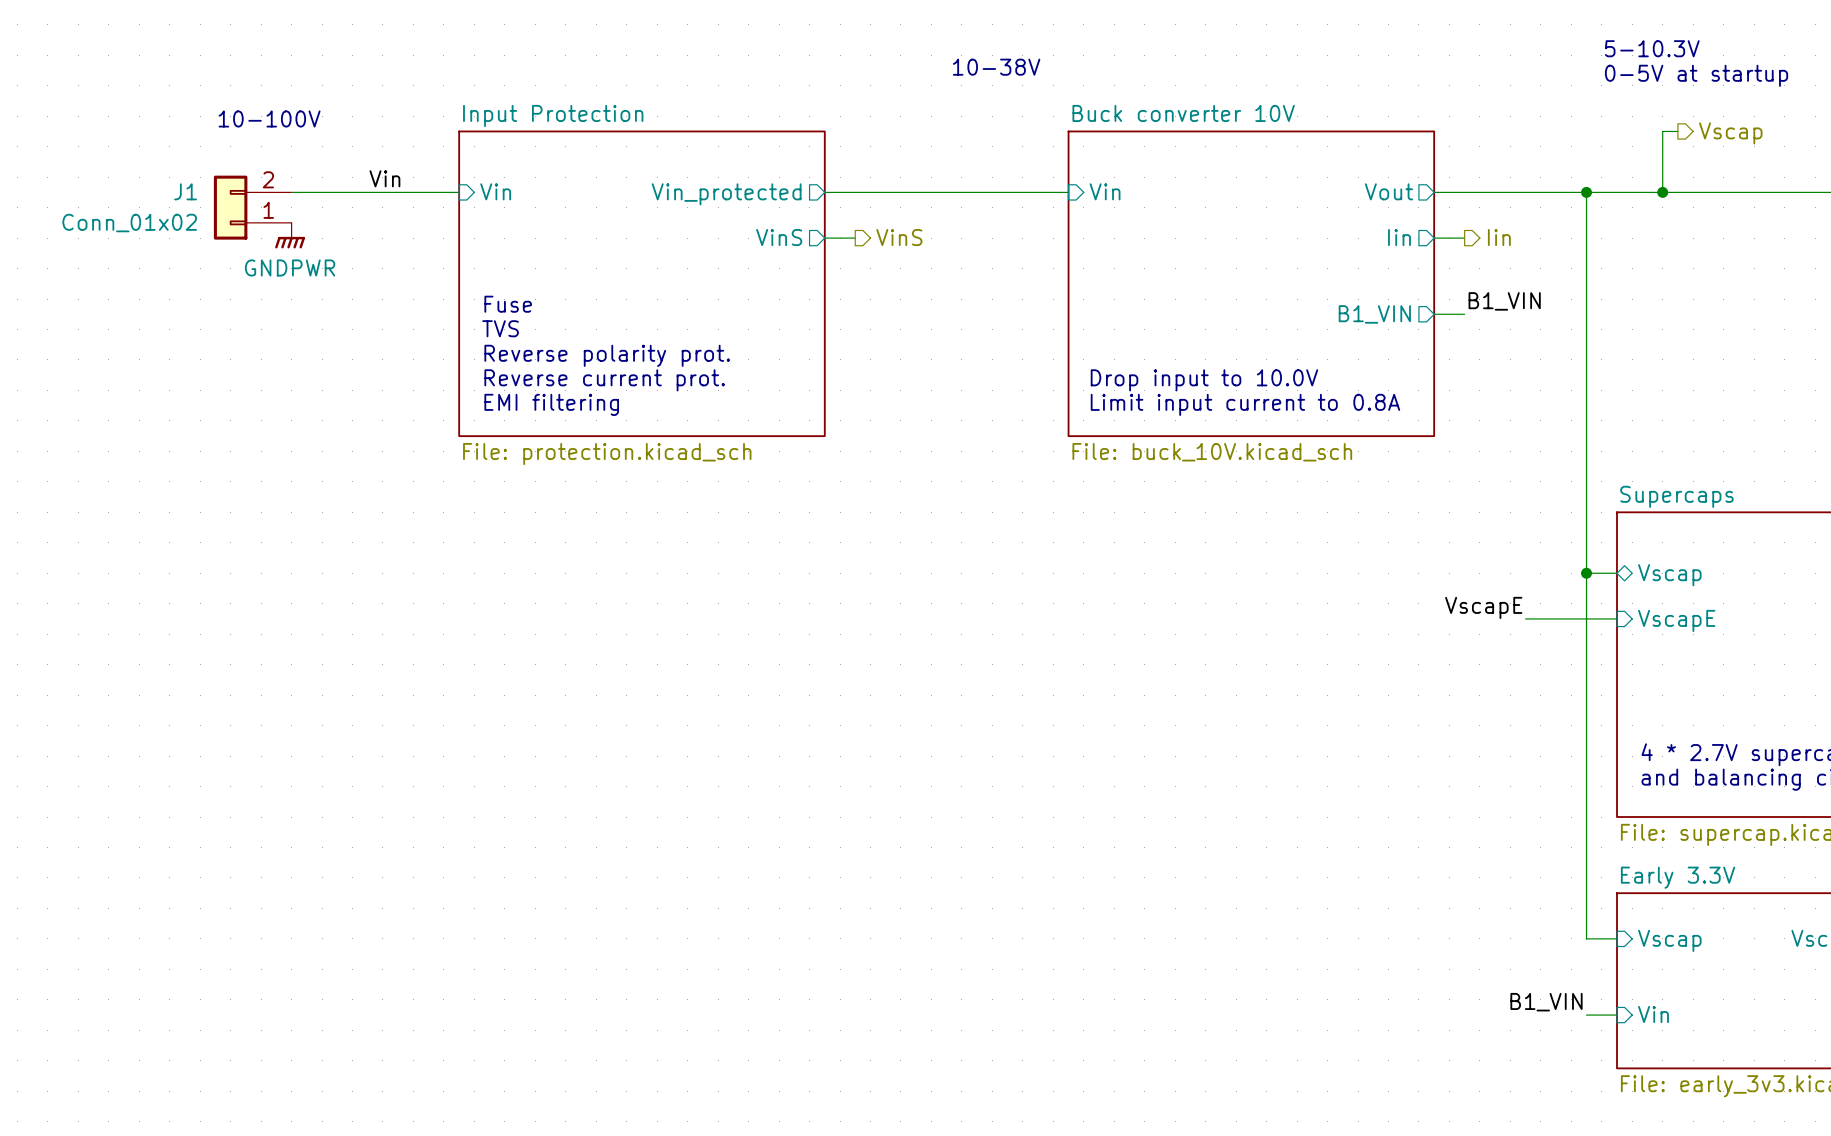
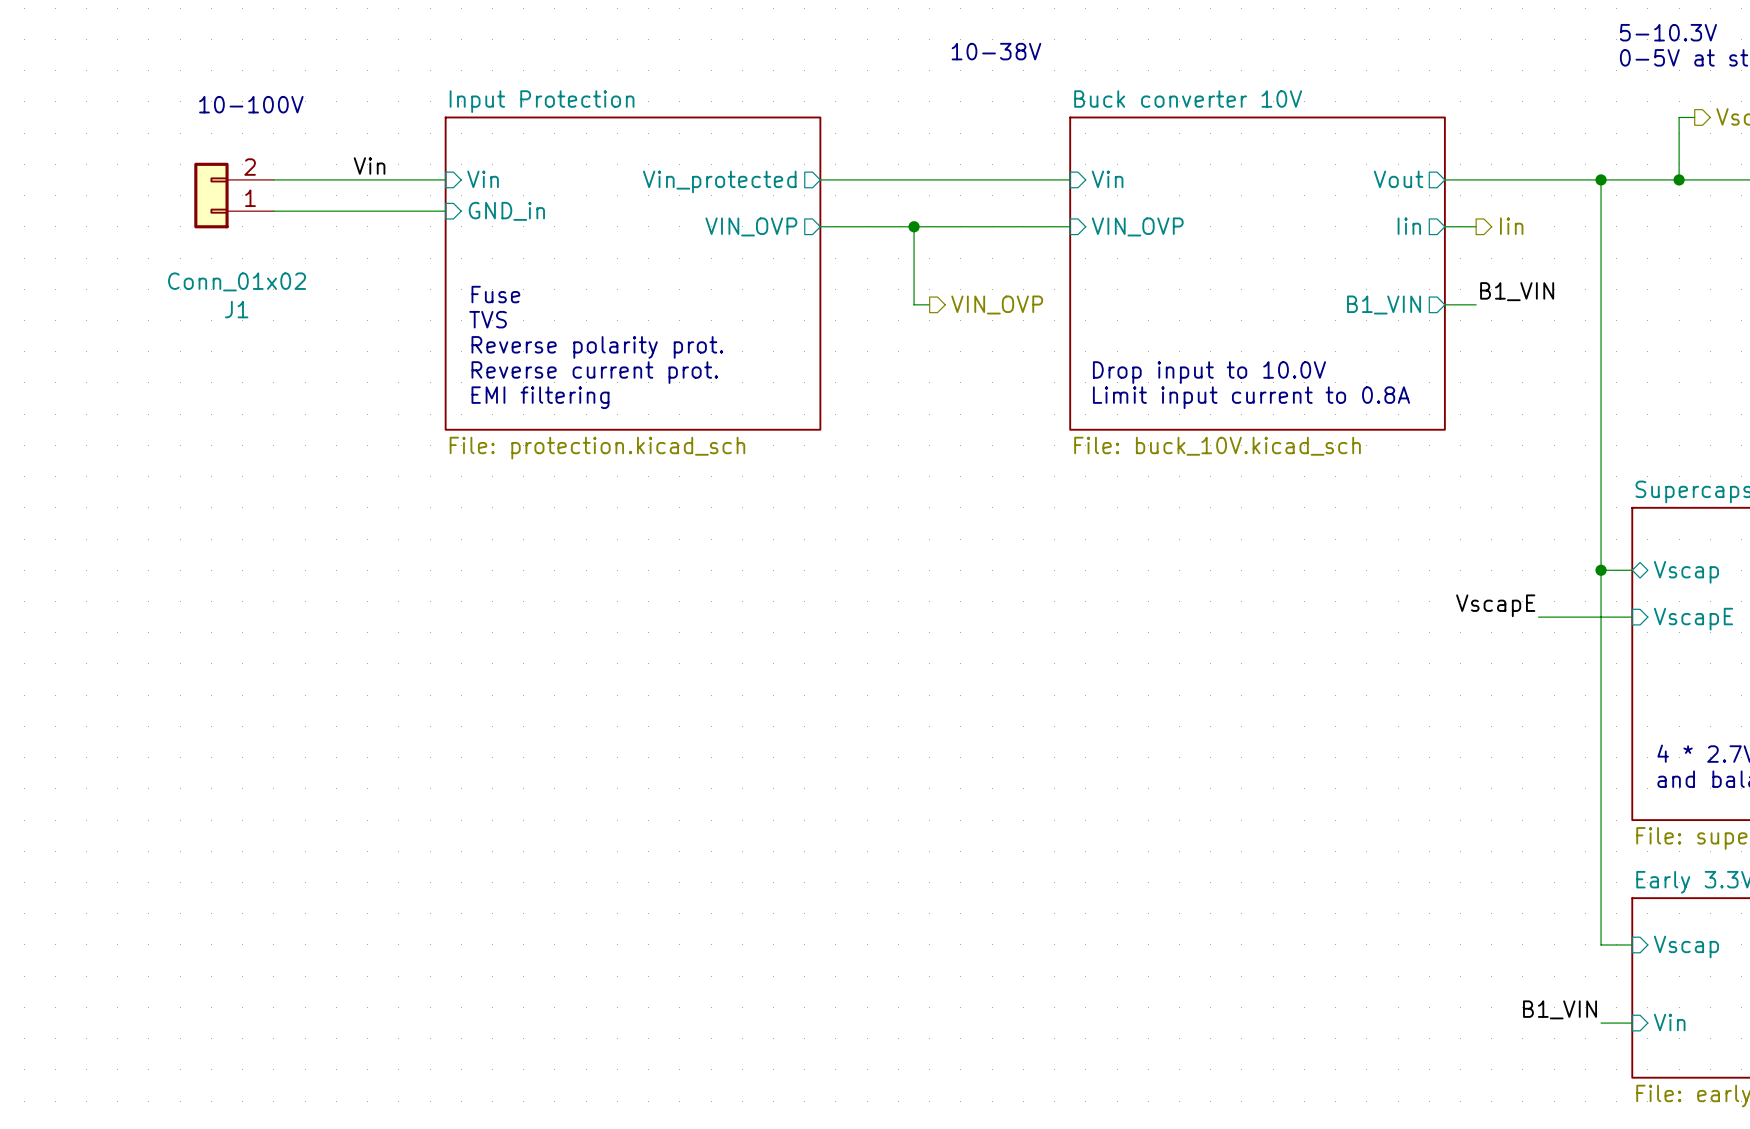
J1 name position: J1 (185, 191) -> J1 (236, 309)
wire: none -> (273, 211) (445, 211)
J1 value position: Conn_01x02 (129, 223) -> Conn_01x02 (237, 281)
sheet pin: none -> GND_in (506, 211)
power symbol: GNDPWR (290, 235) -> none
sheet pin: VinS (779, 237) -> VIN_OVP (751, 226)
hierarchical label: VinS (899, 237) -> none
wire: none -> (851, 226) (1070, 226)
wire: none -> (914, 226) (914, 304) (929, 304)
junction: none -> (914, 226)
sheet pin: none -> VIN_OVP (1137, 226)
hierarchical label: none -> VIN_OVP (997, 305)

